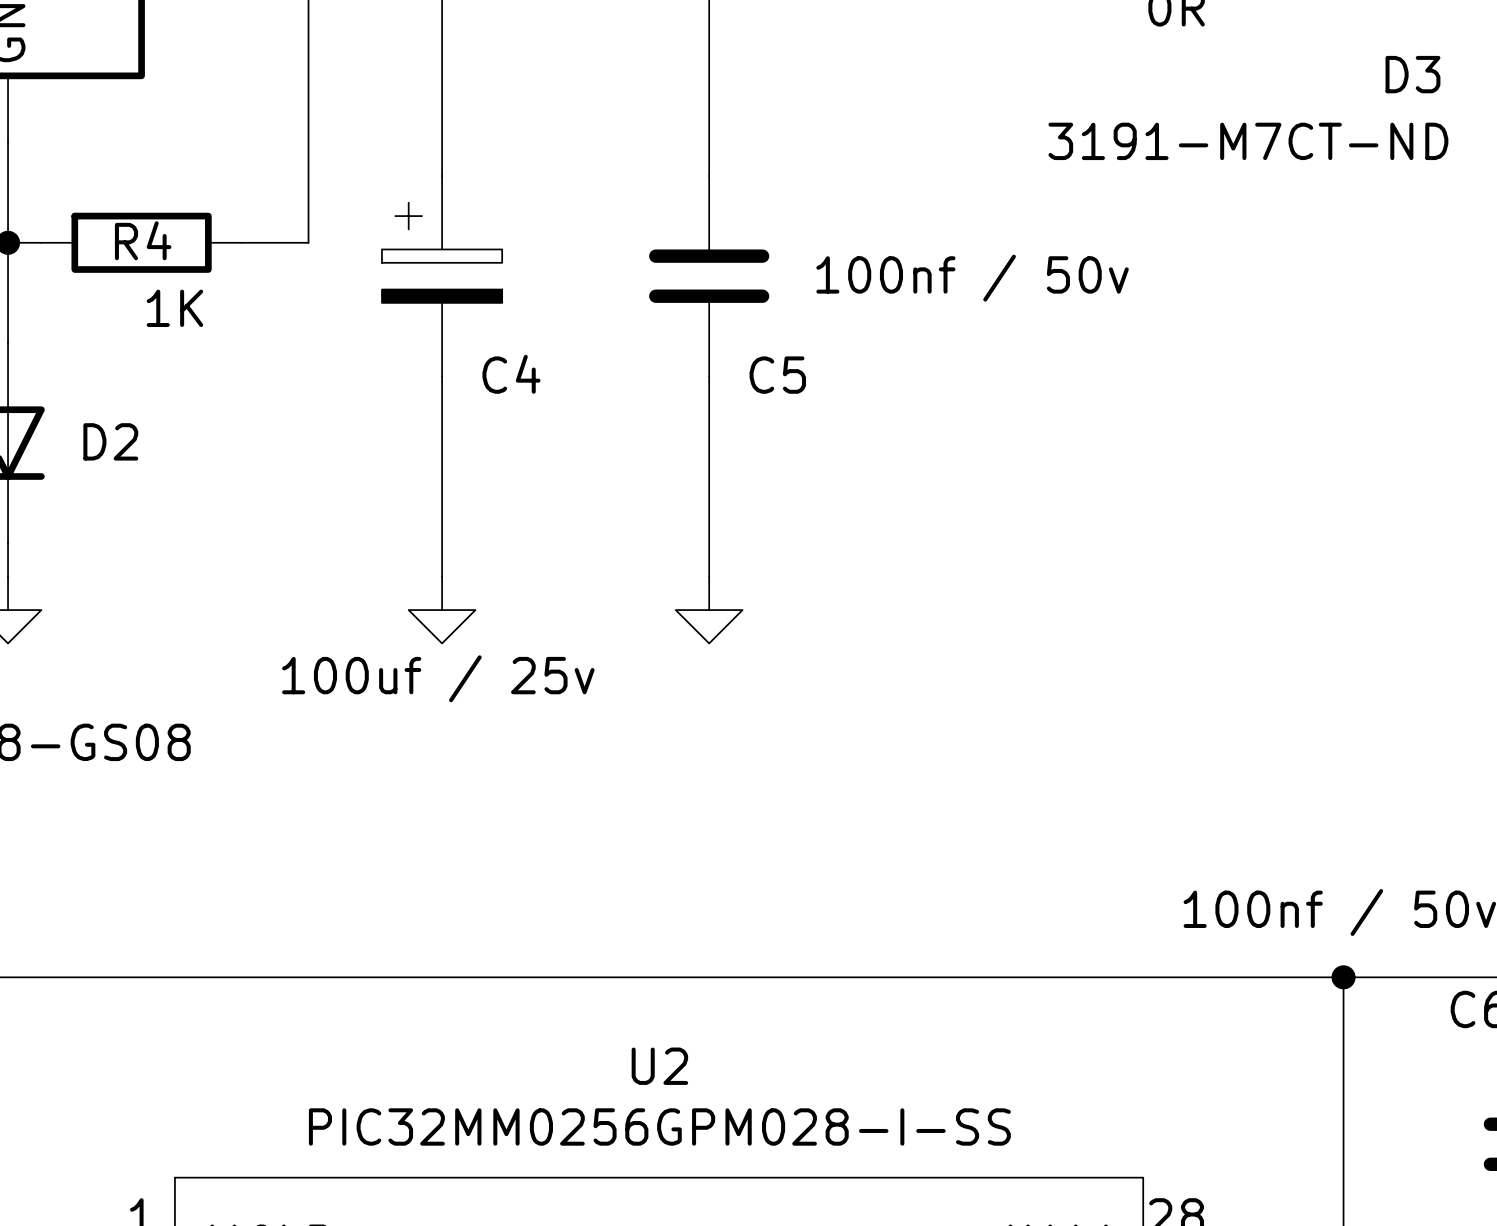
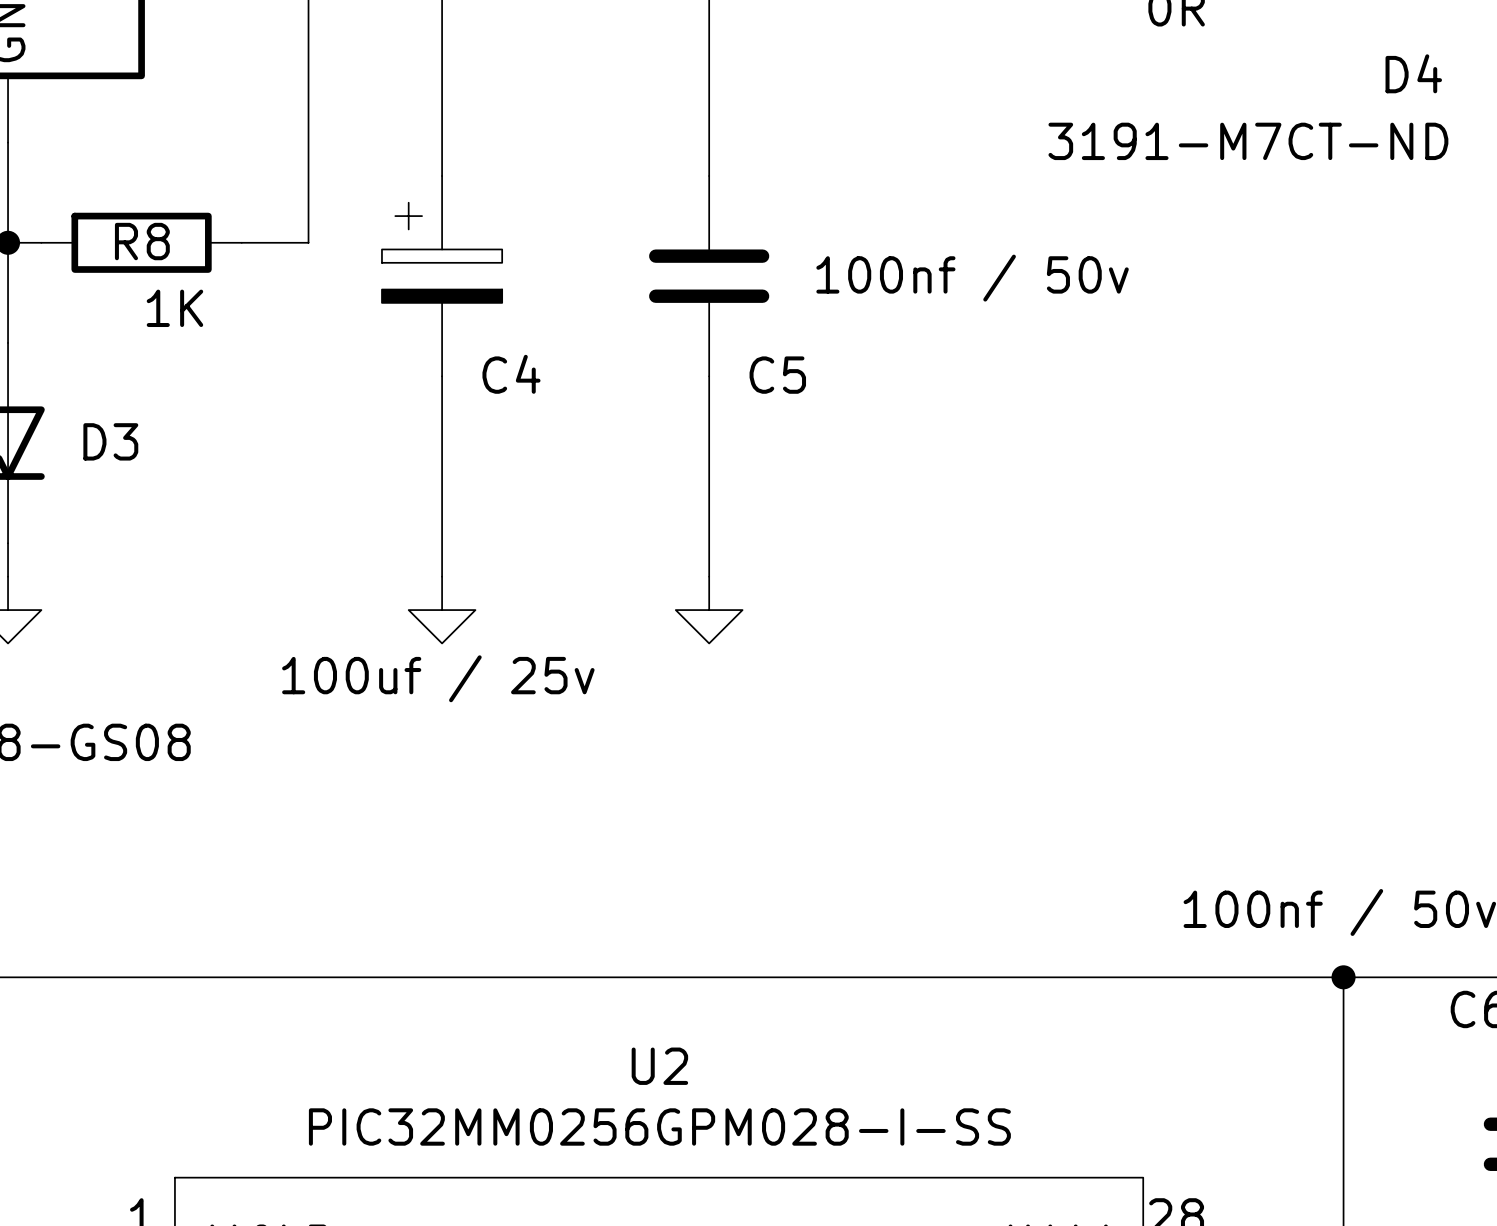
D3 name: D3 (1412, 74) -> D4 (1413, 73)
R4 name: R4 (143, 240) -> R8 (142, 241)
D2 name: D2 (110, 441) -> D3 (110, 441)

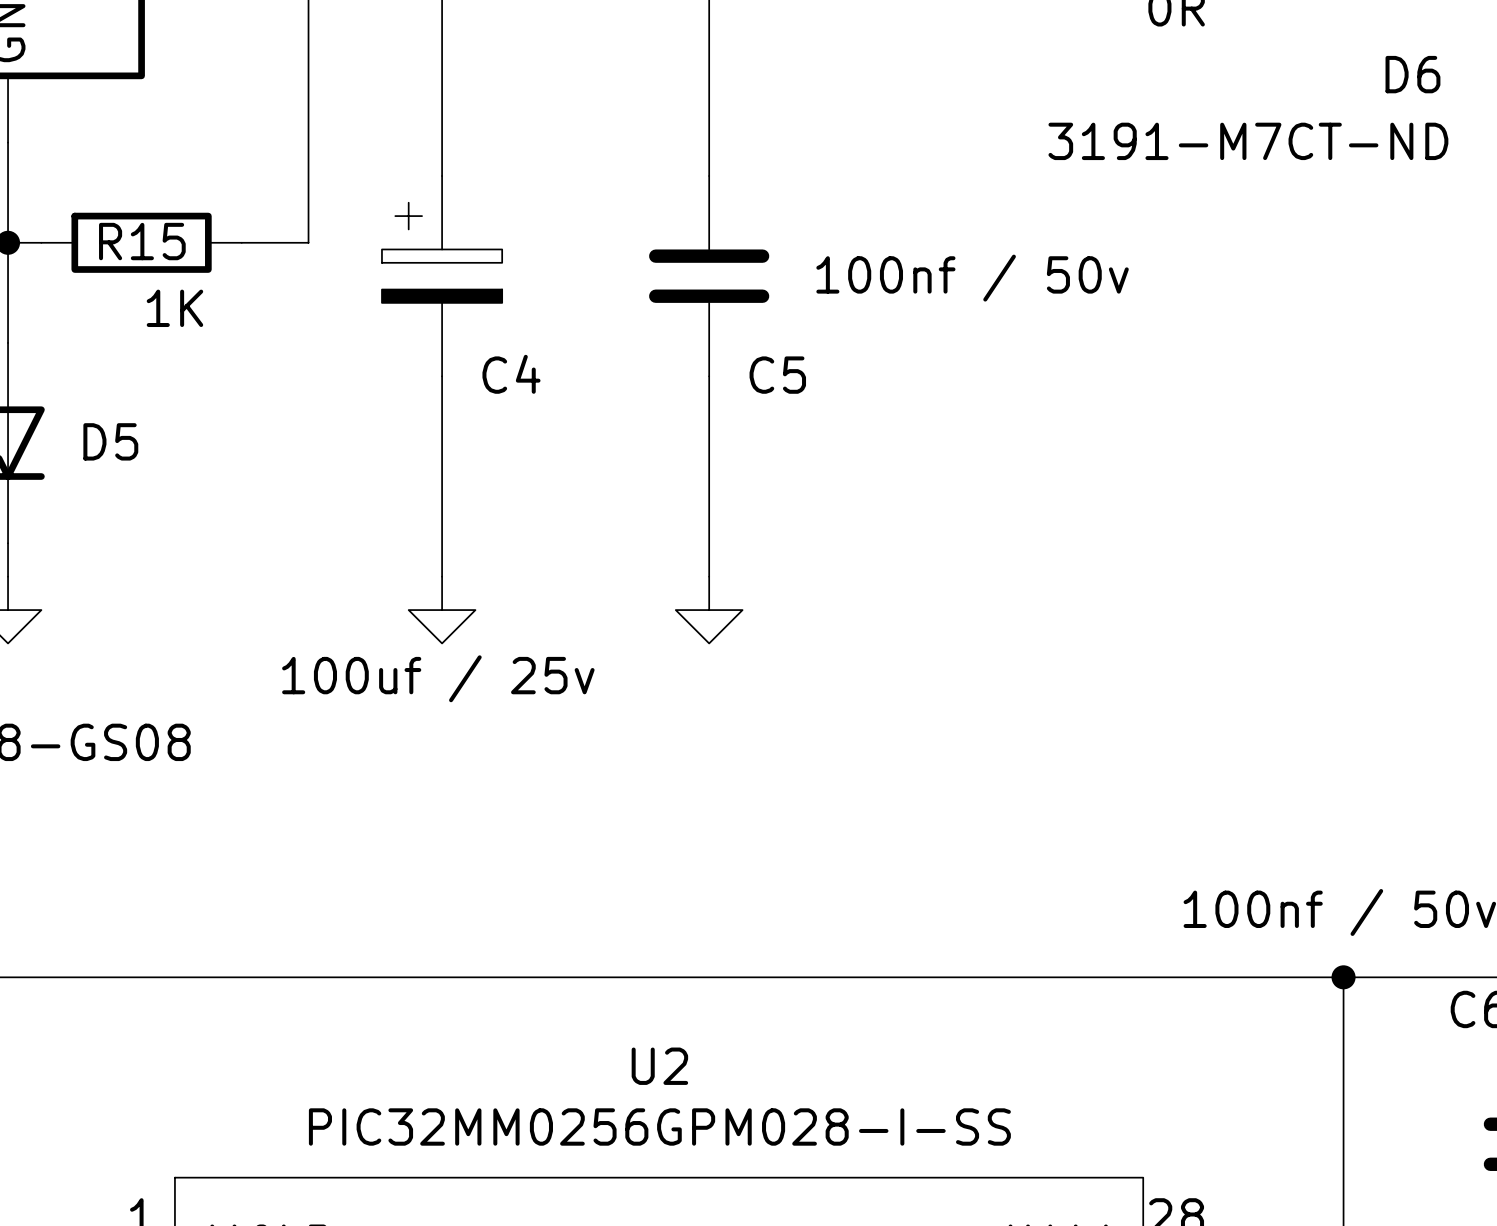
D4 name: D4 (1413, 73) -> D6 (1412, 74)
R8 name: R8 (142, 241) -> R15 (142, 241)
D3 name: D3 (110, 441) -> D5 (110, 441)

